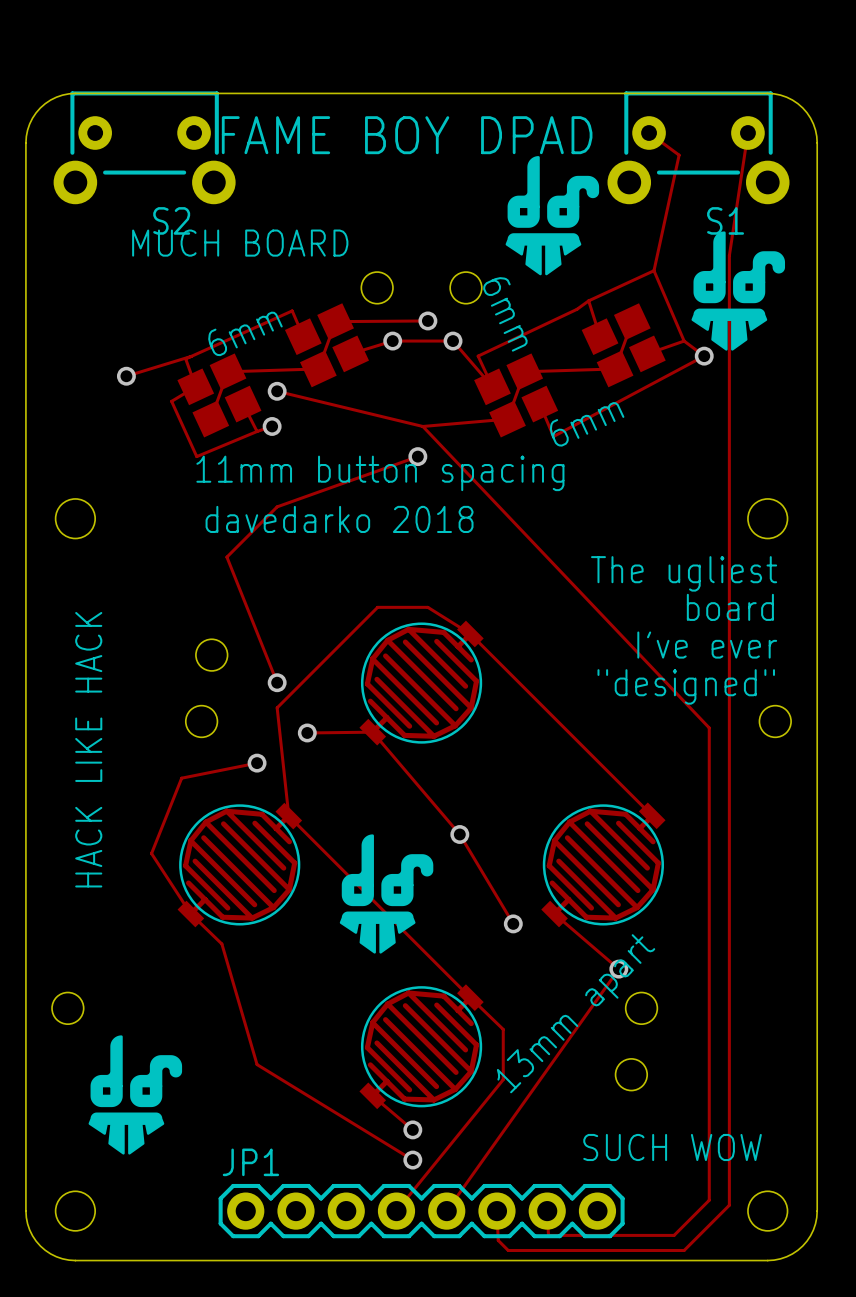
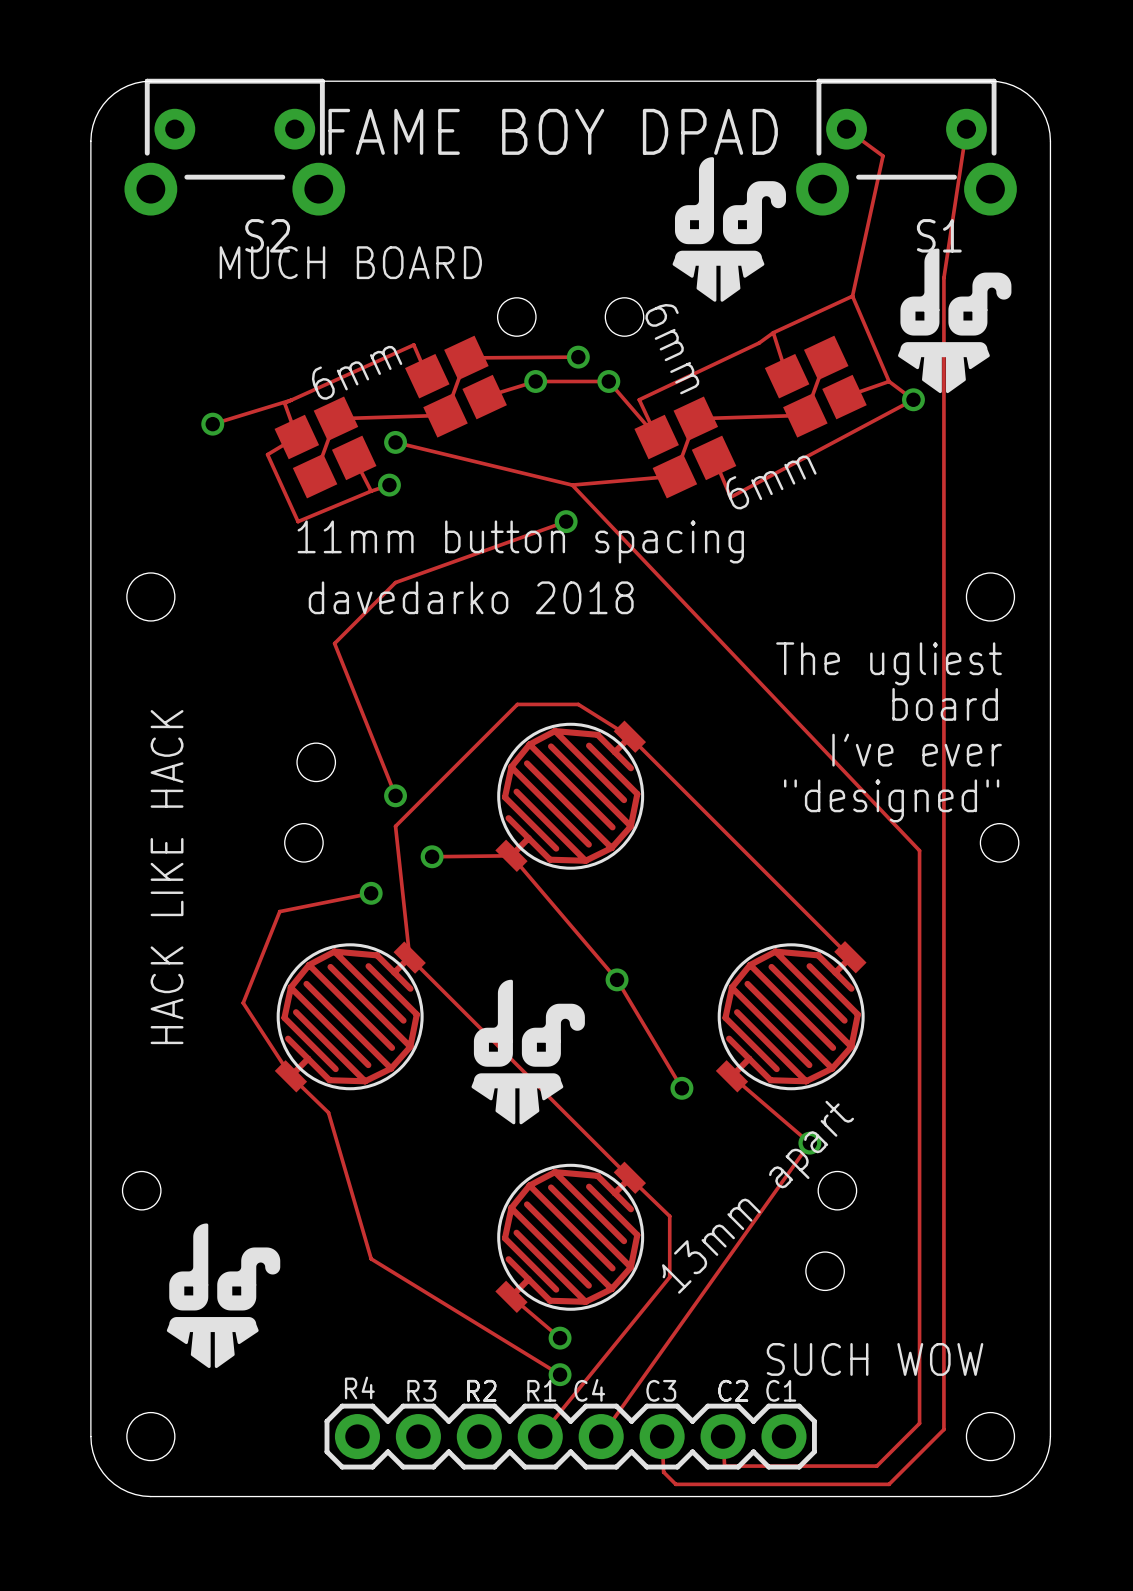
JP1 name: JP1 (250, 1162) -> none
text: none -> R4 (359, 1387)
text: none -> C4 (589, 1390)
text: none -> R3 (421, 1390)
text: none -> R2 (481, 1390)
text: none -> R1 (541, 1390)
text: none -> C3 (661, 1390)
text: none -> C2 (733, 1390)
text: none -> C1 (781, 1390)

